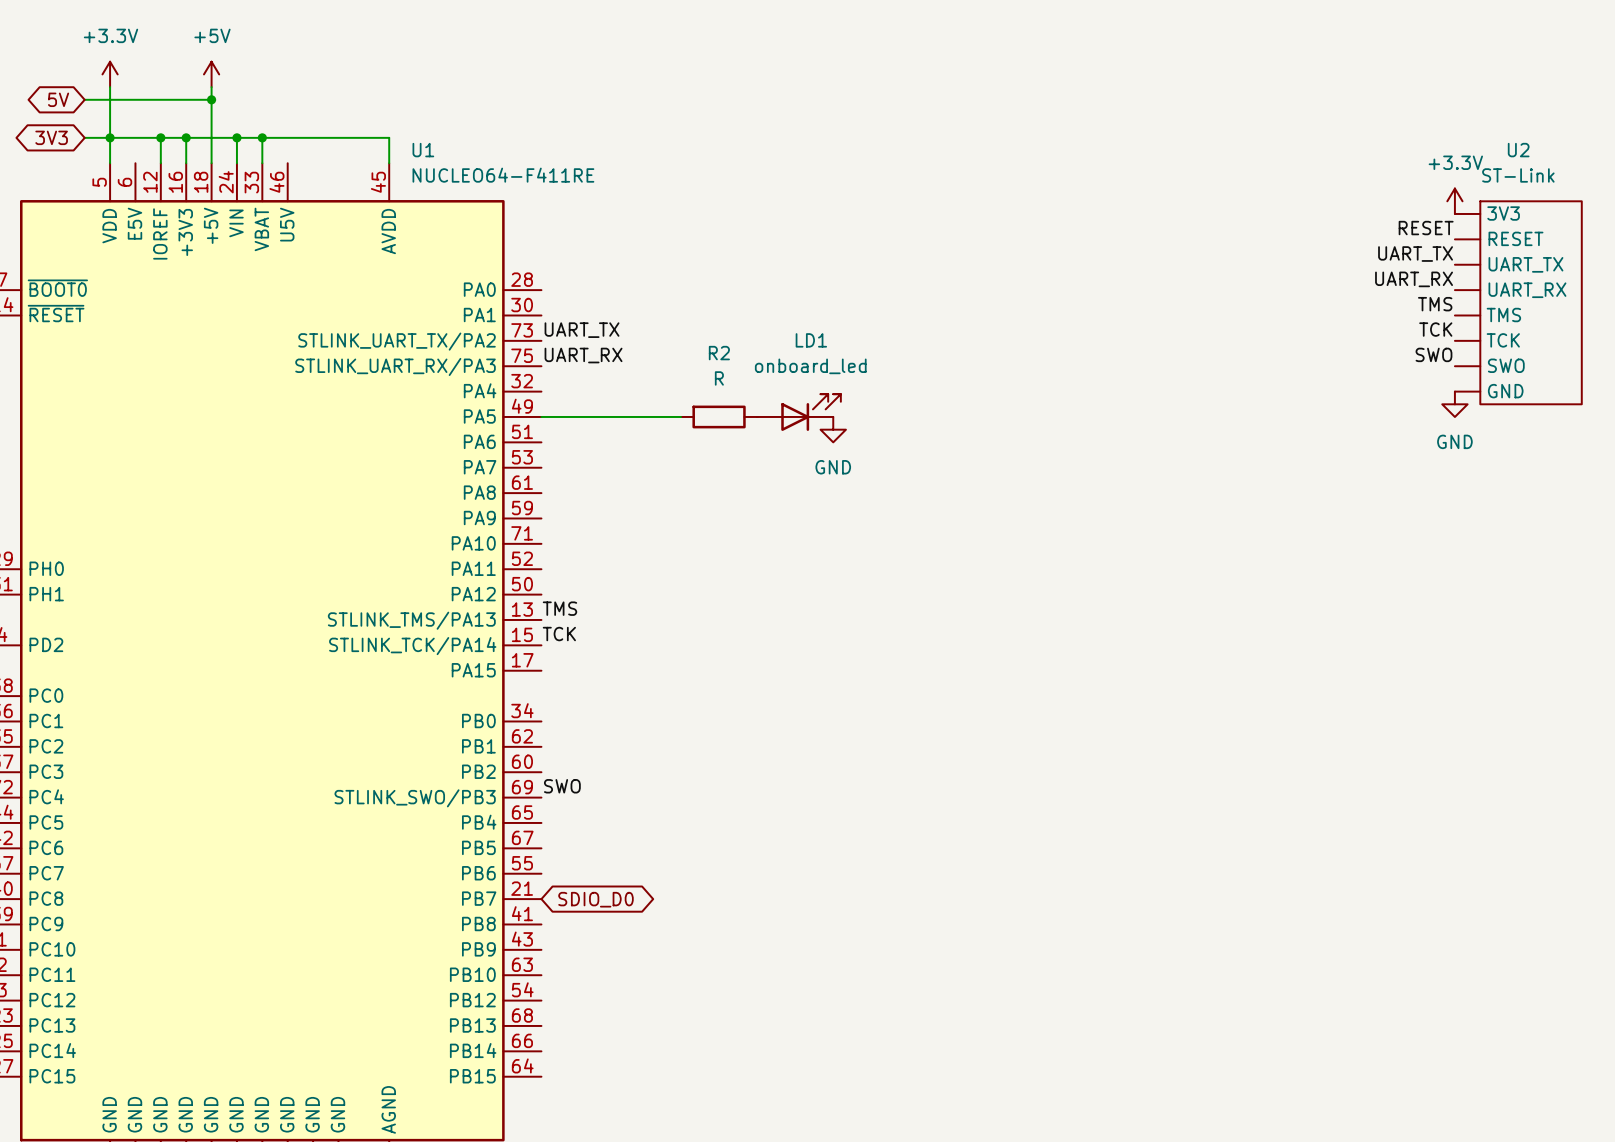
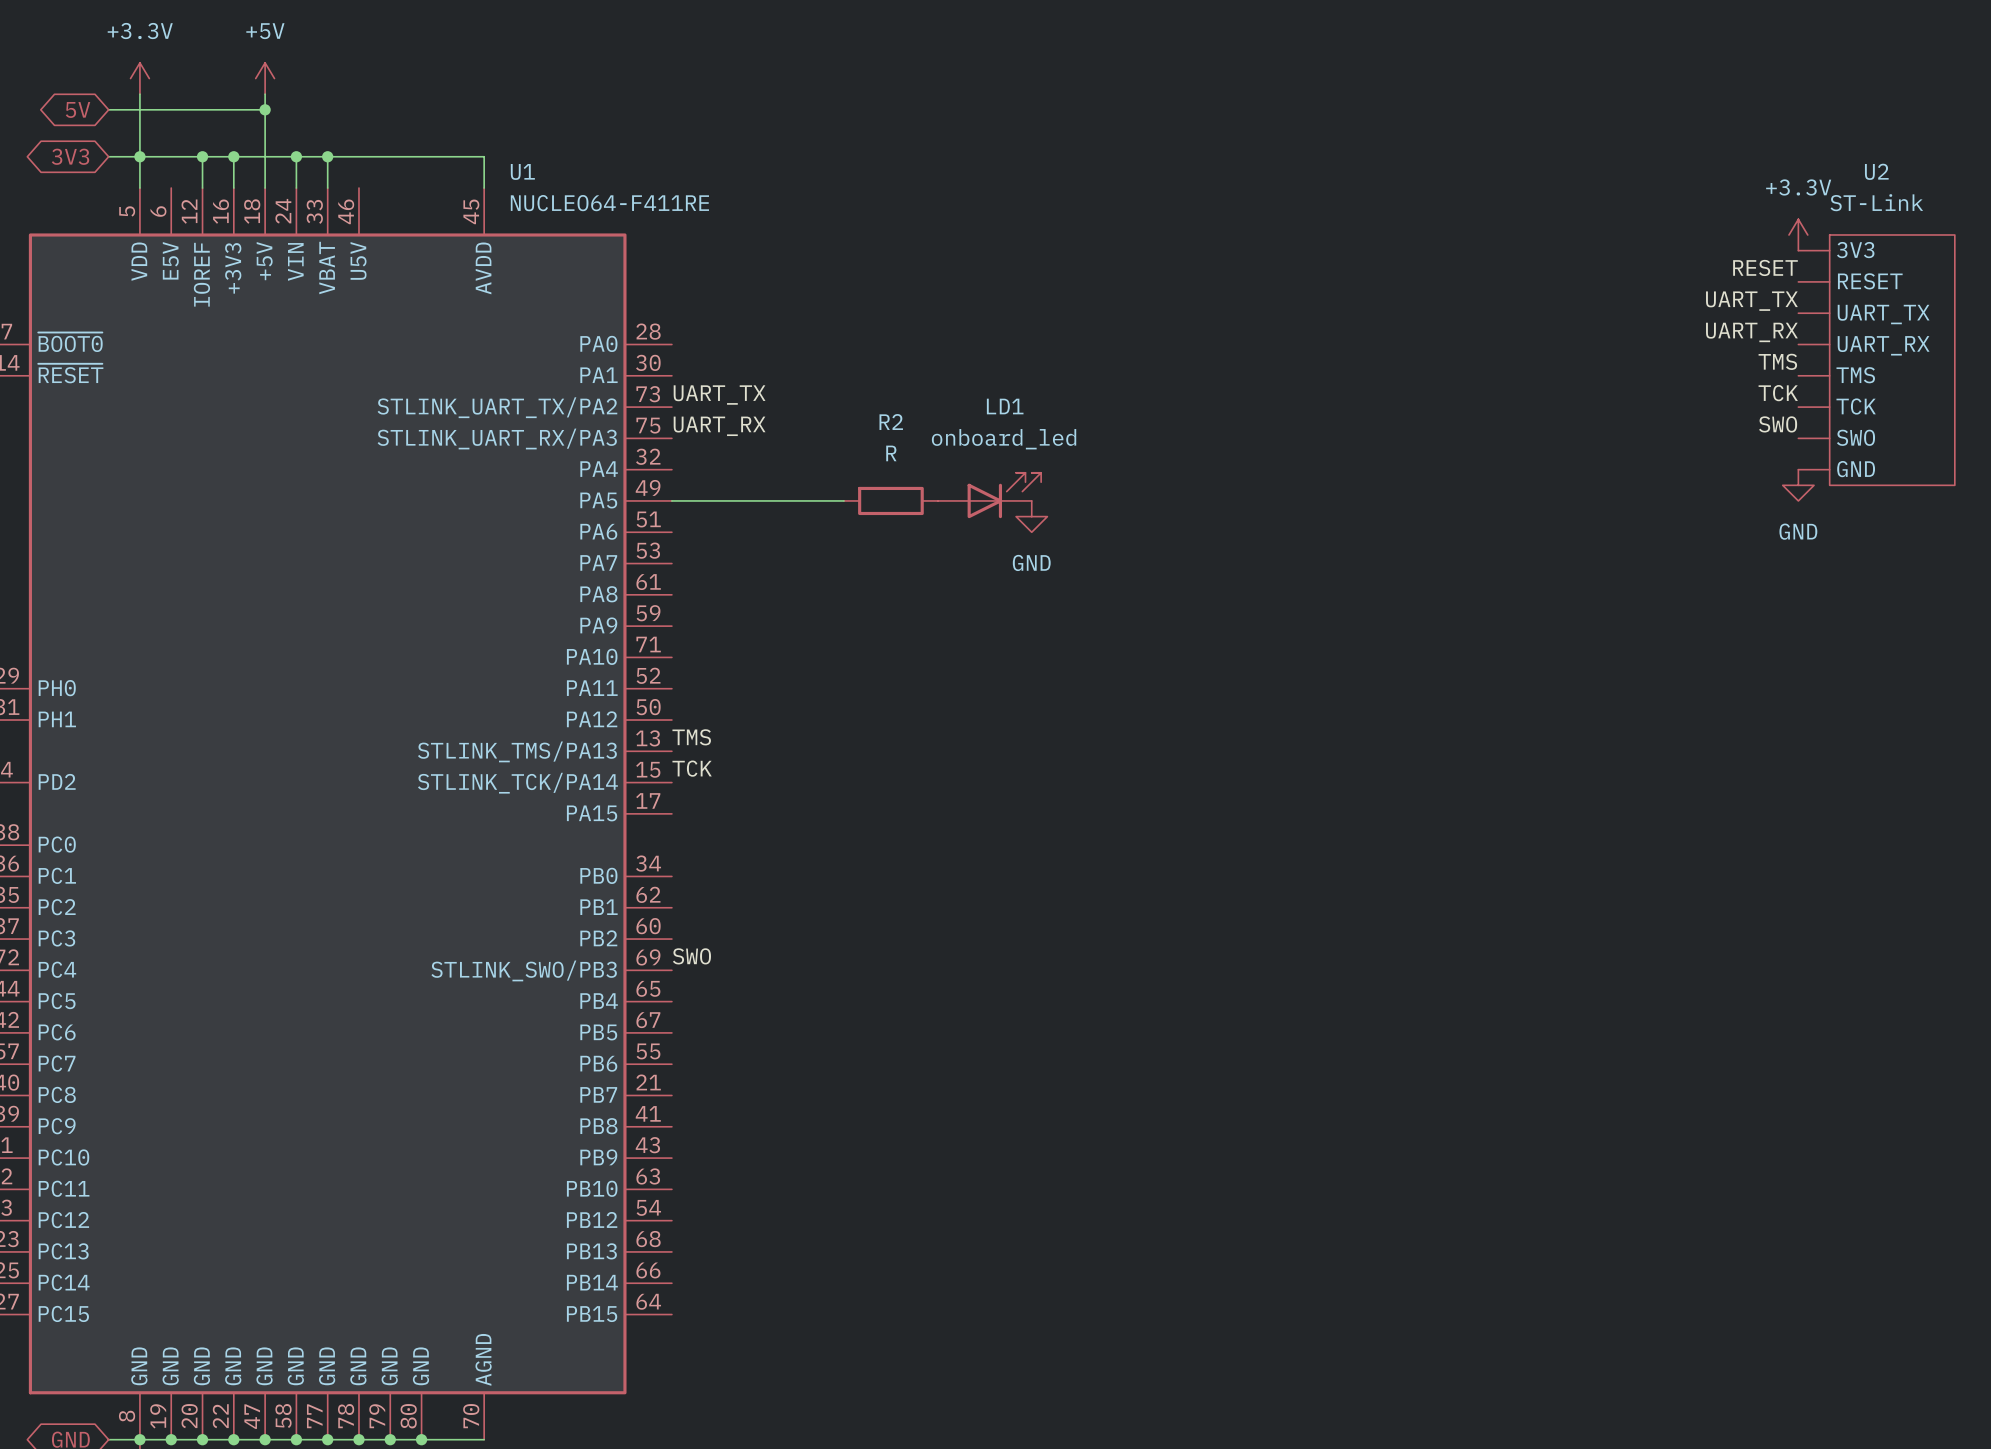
global label: SDIO_D0 (595, 899) -> none

